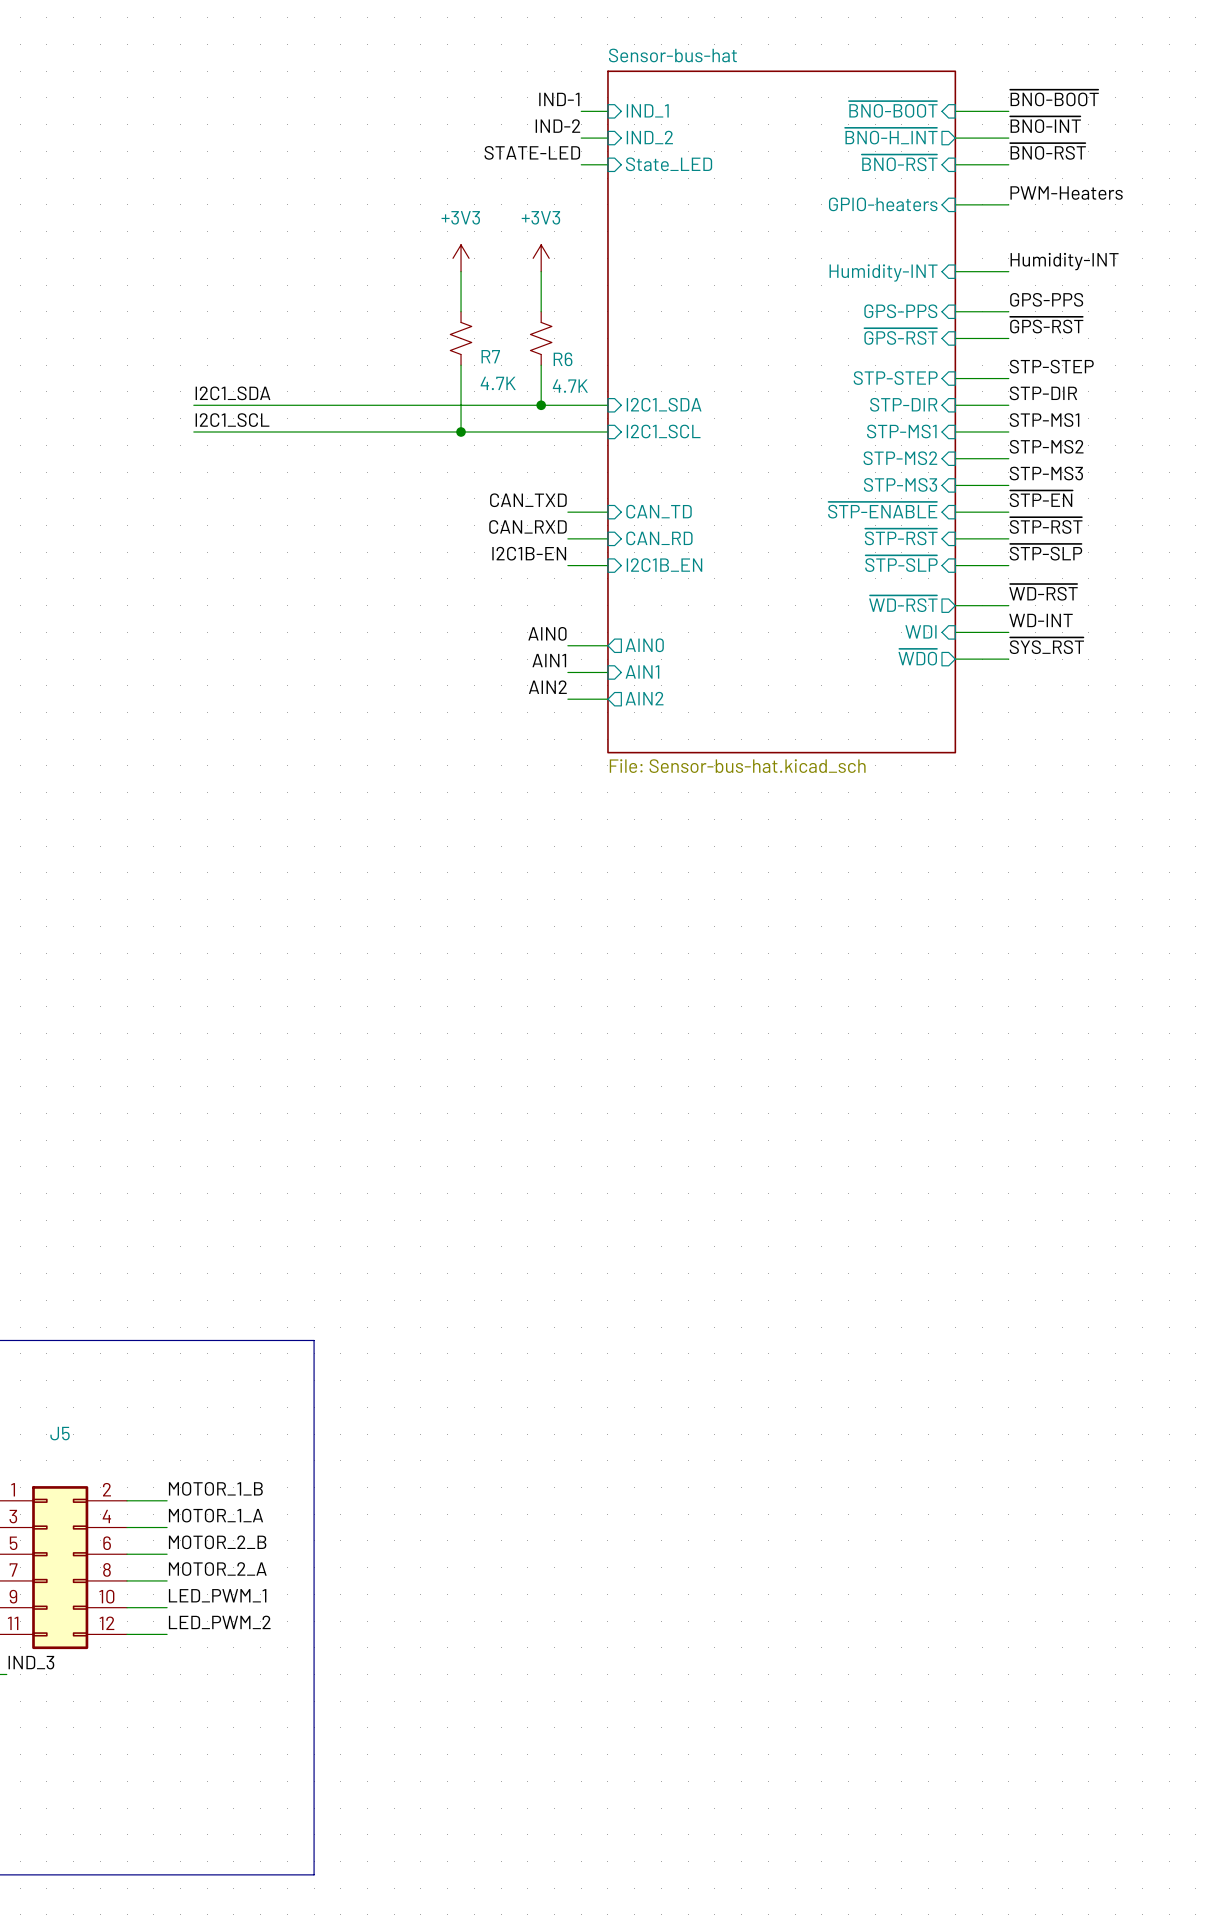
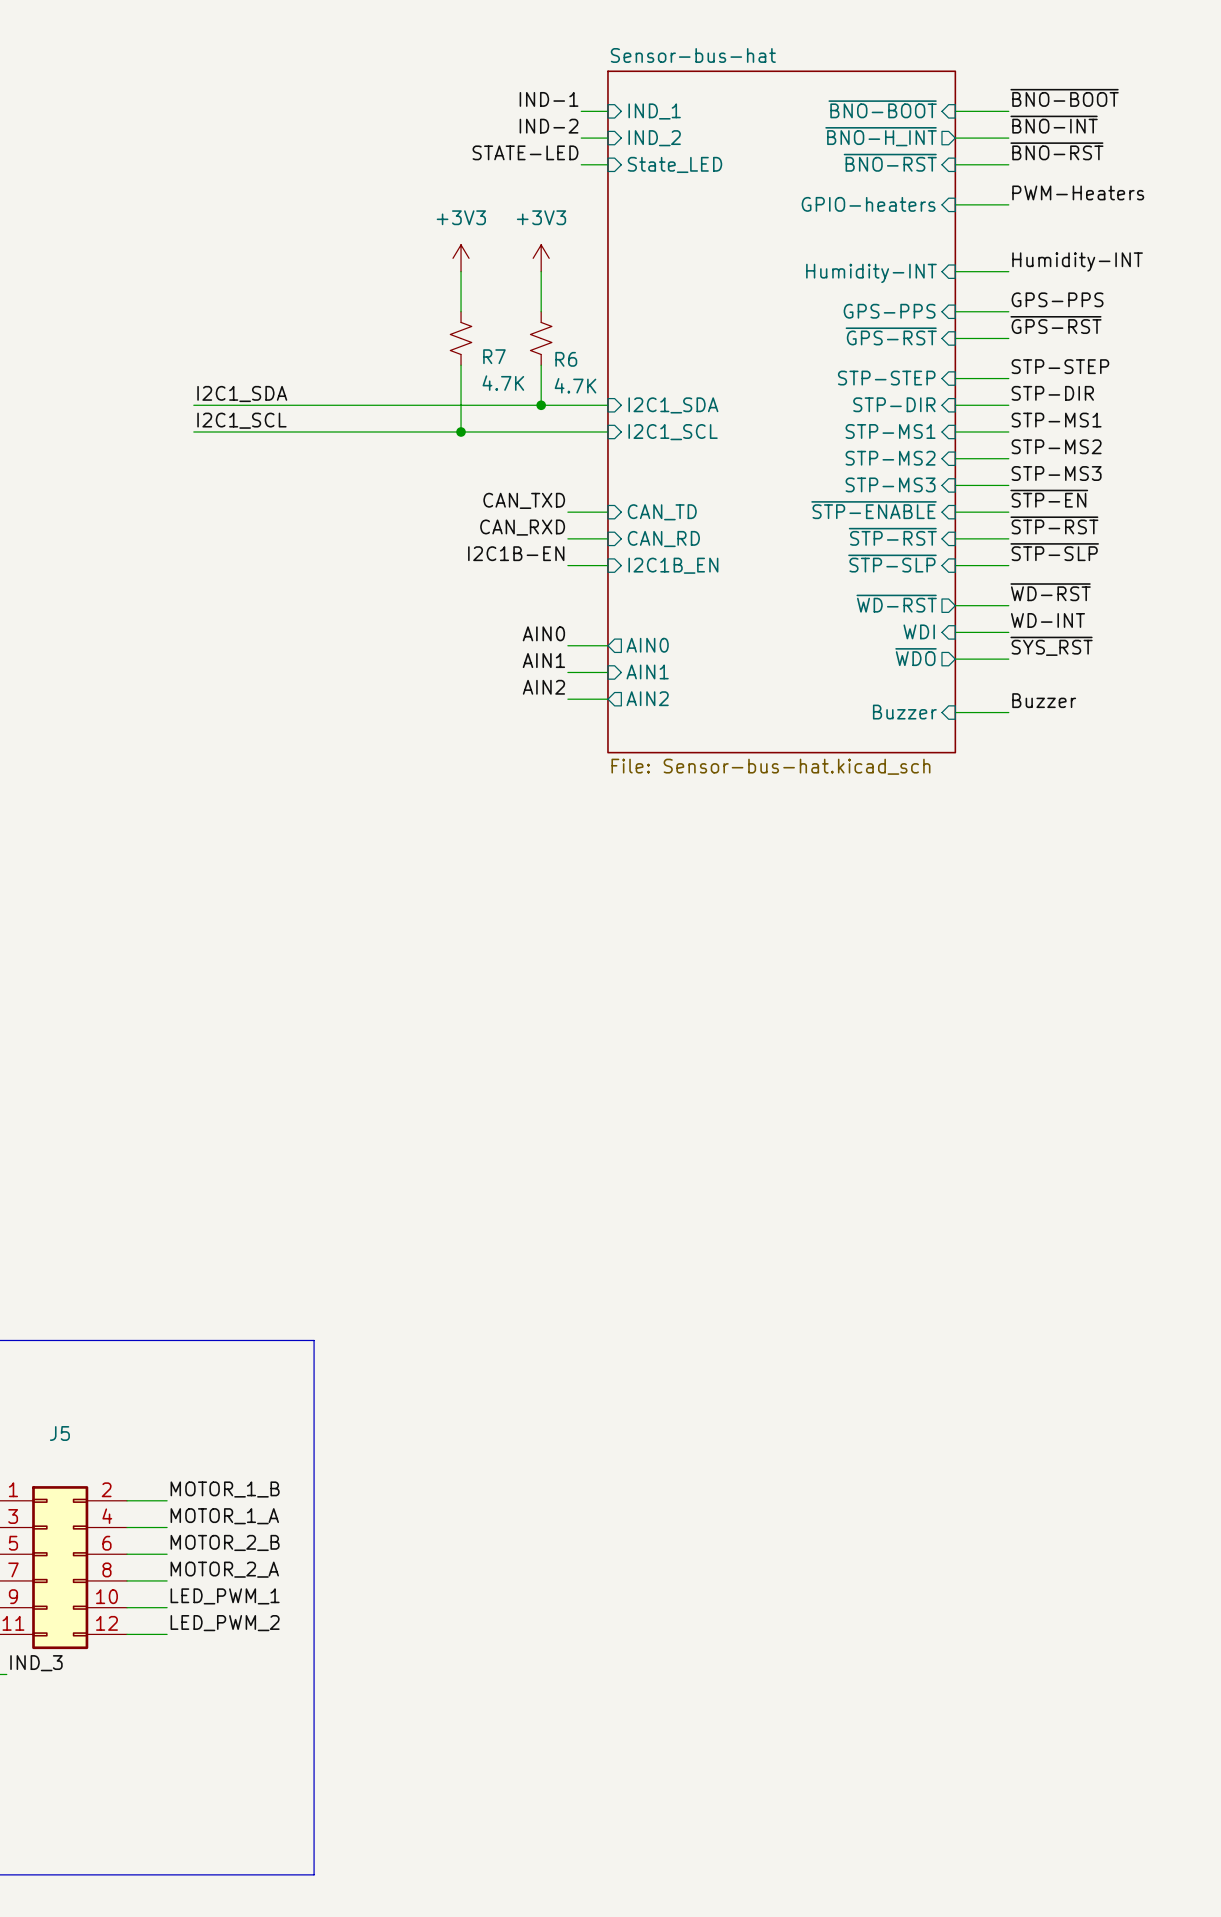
label: none -> Buzzer (1044, 700)
sheet pin: none -> Buzzer (904, 712)
wire: none -> (955, 712) (1008, 712)

